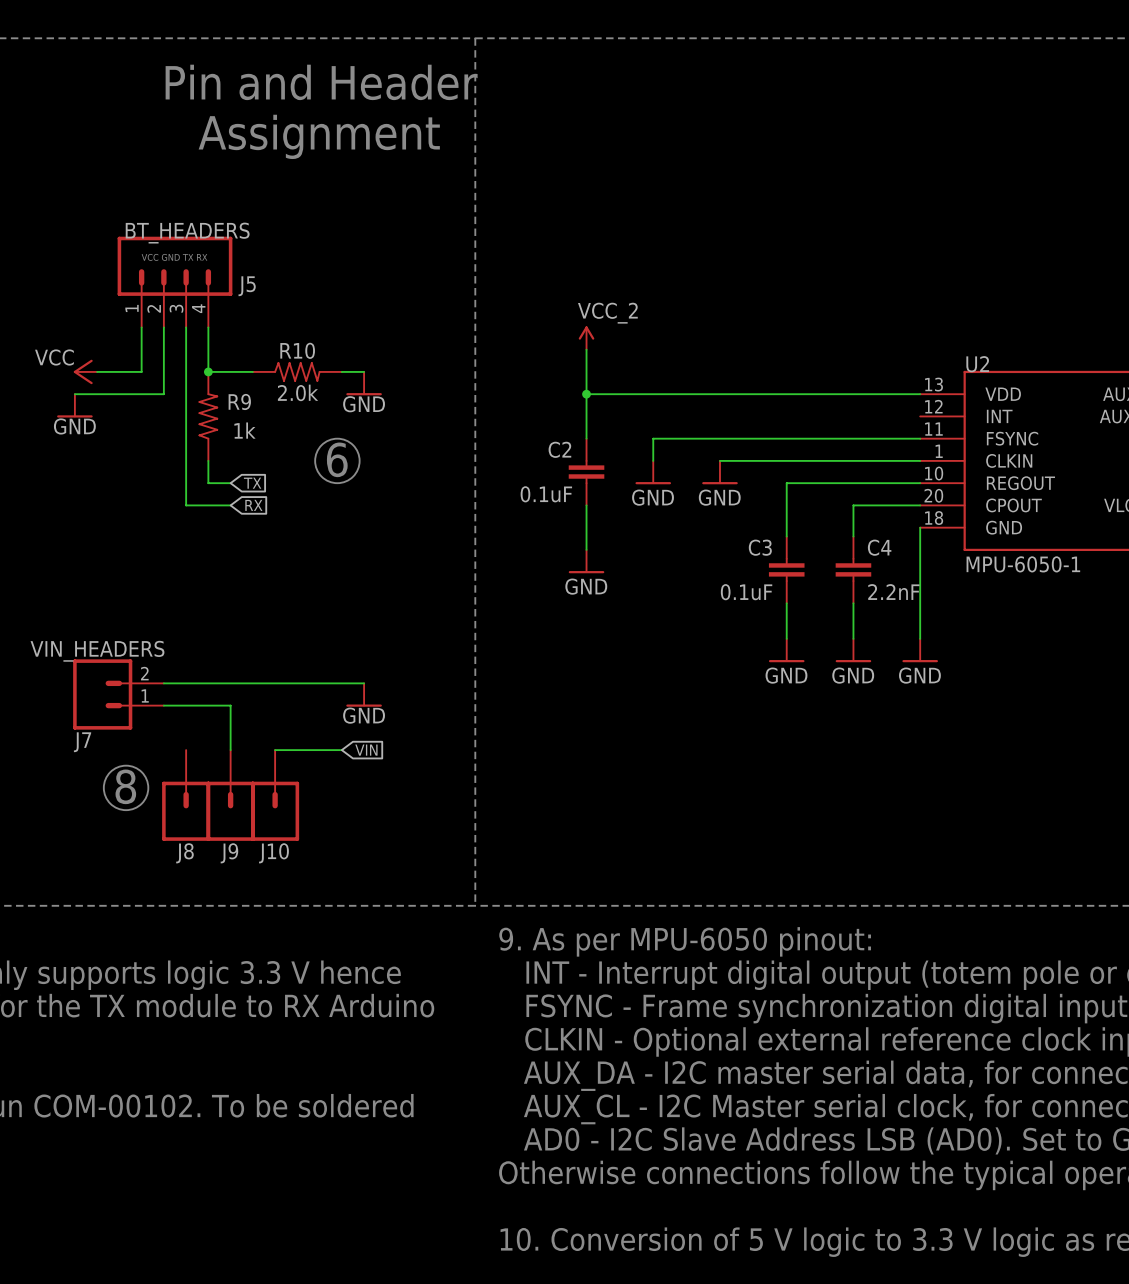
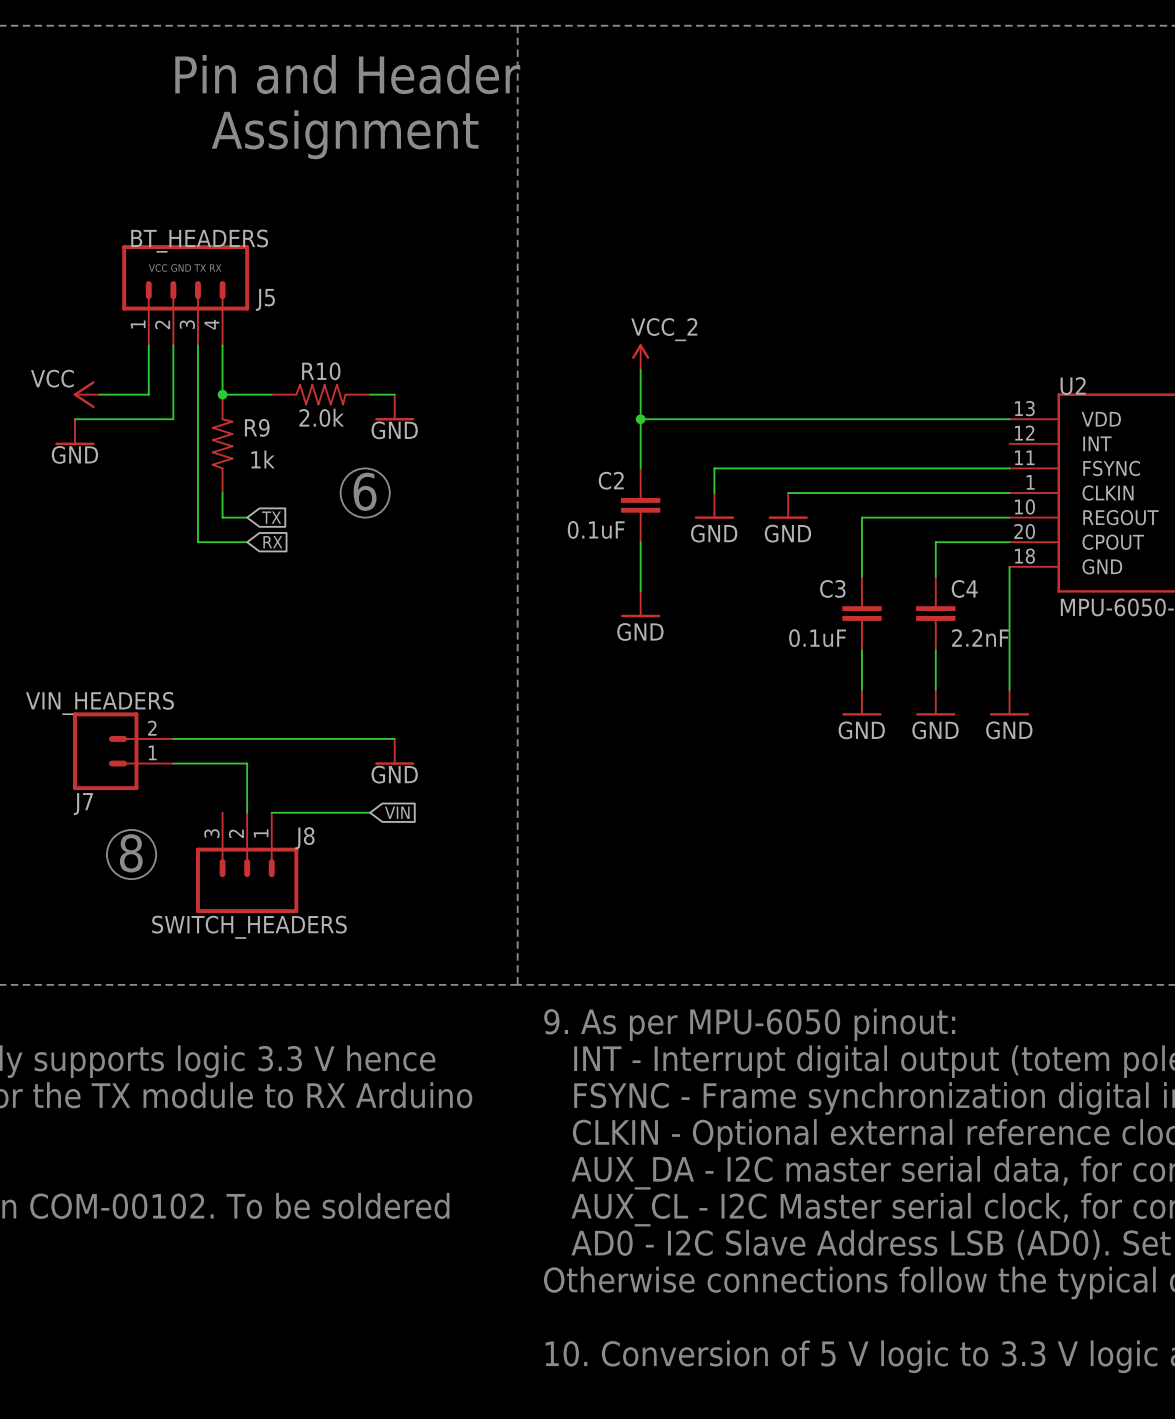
wire: none -> (271, 812) (296, 812)
J8: (186, 795) -> none
J9: (230, 795) -> none
SWITCH_HEADERS: none -> J8 (247, 862)
J10: (275, 795) -> none

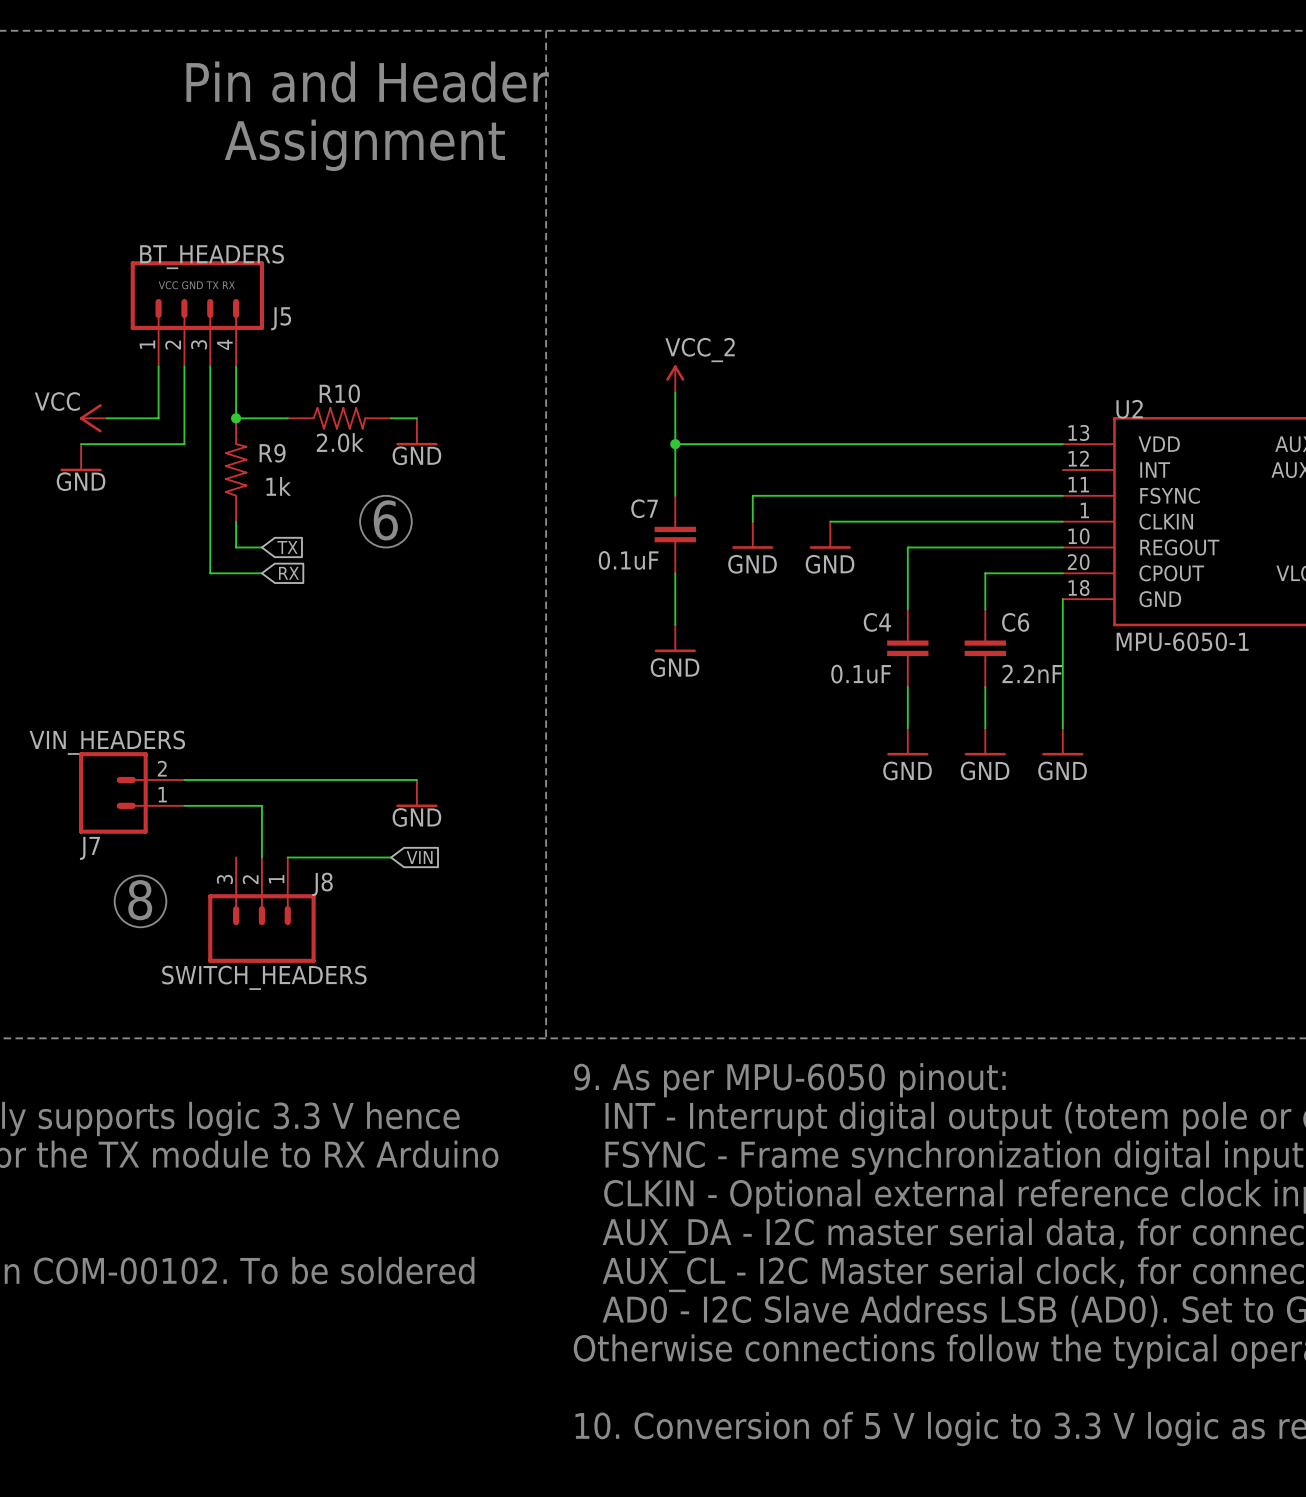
C2 name: C2 (611, 480) -> C7 (644, 508)
C3 name: C3 (832, 588) -> C4 (877, 622)
C4 name: C4 (964, 588) -> C6 (1015, 622)

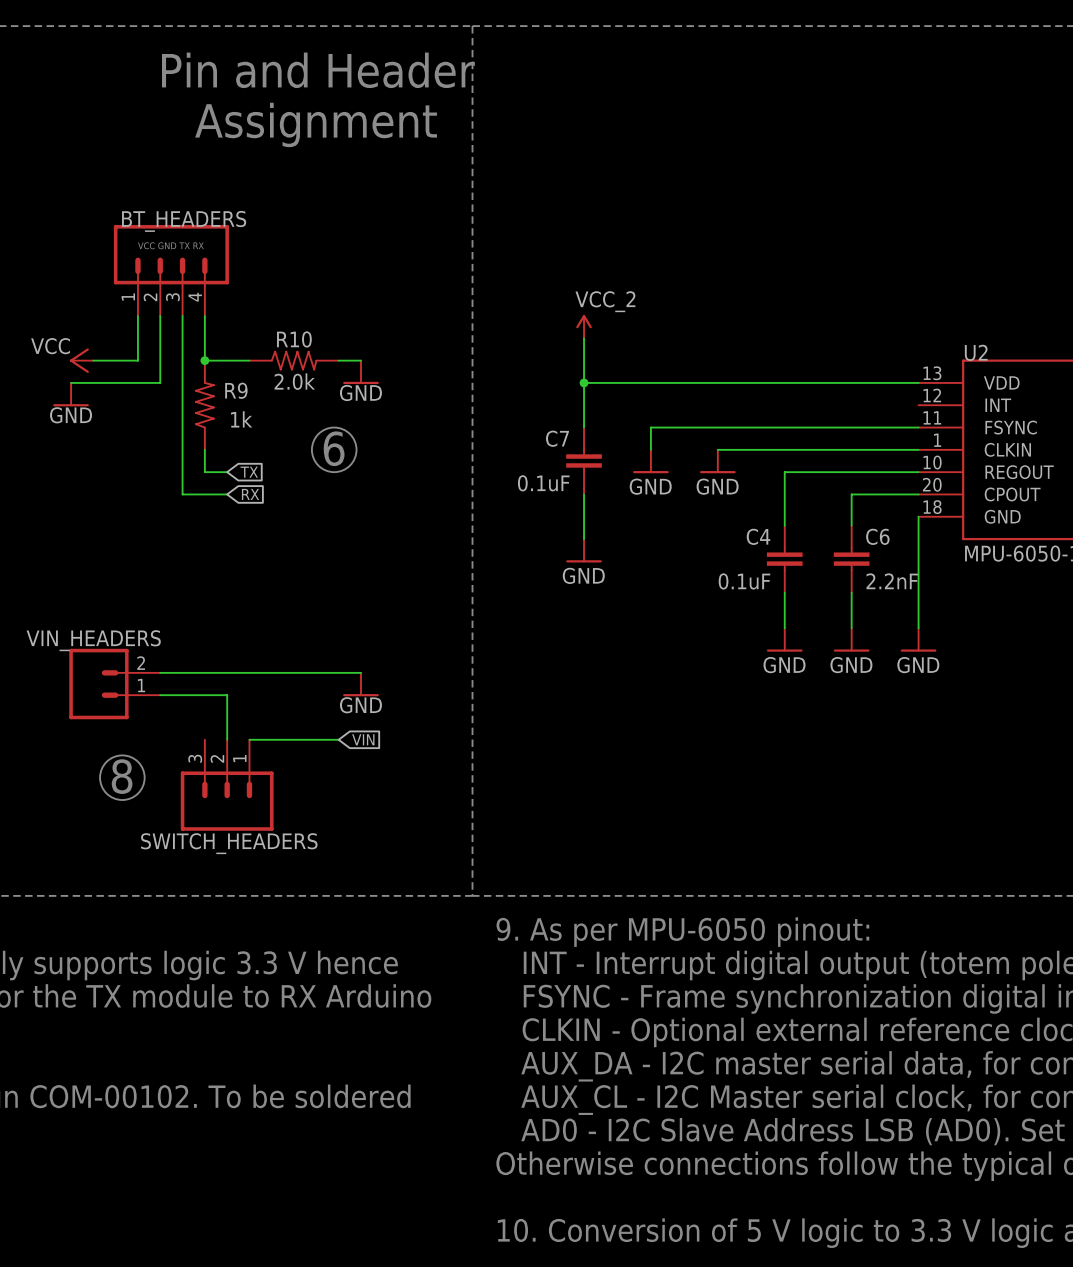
BT_HEADERS value: J5 (281, 318) -> none
VIN_HEADERS value: J7 (89, 848) -> none
SWITCH_HEADERS value: J8 (322, 884) -> none

